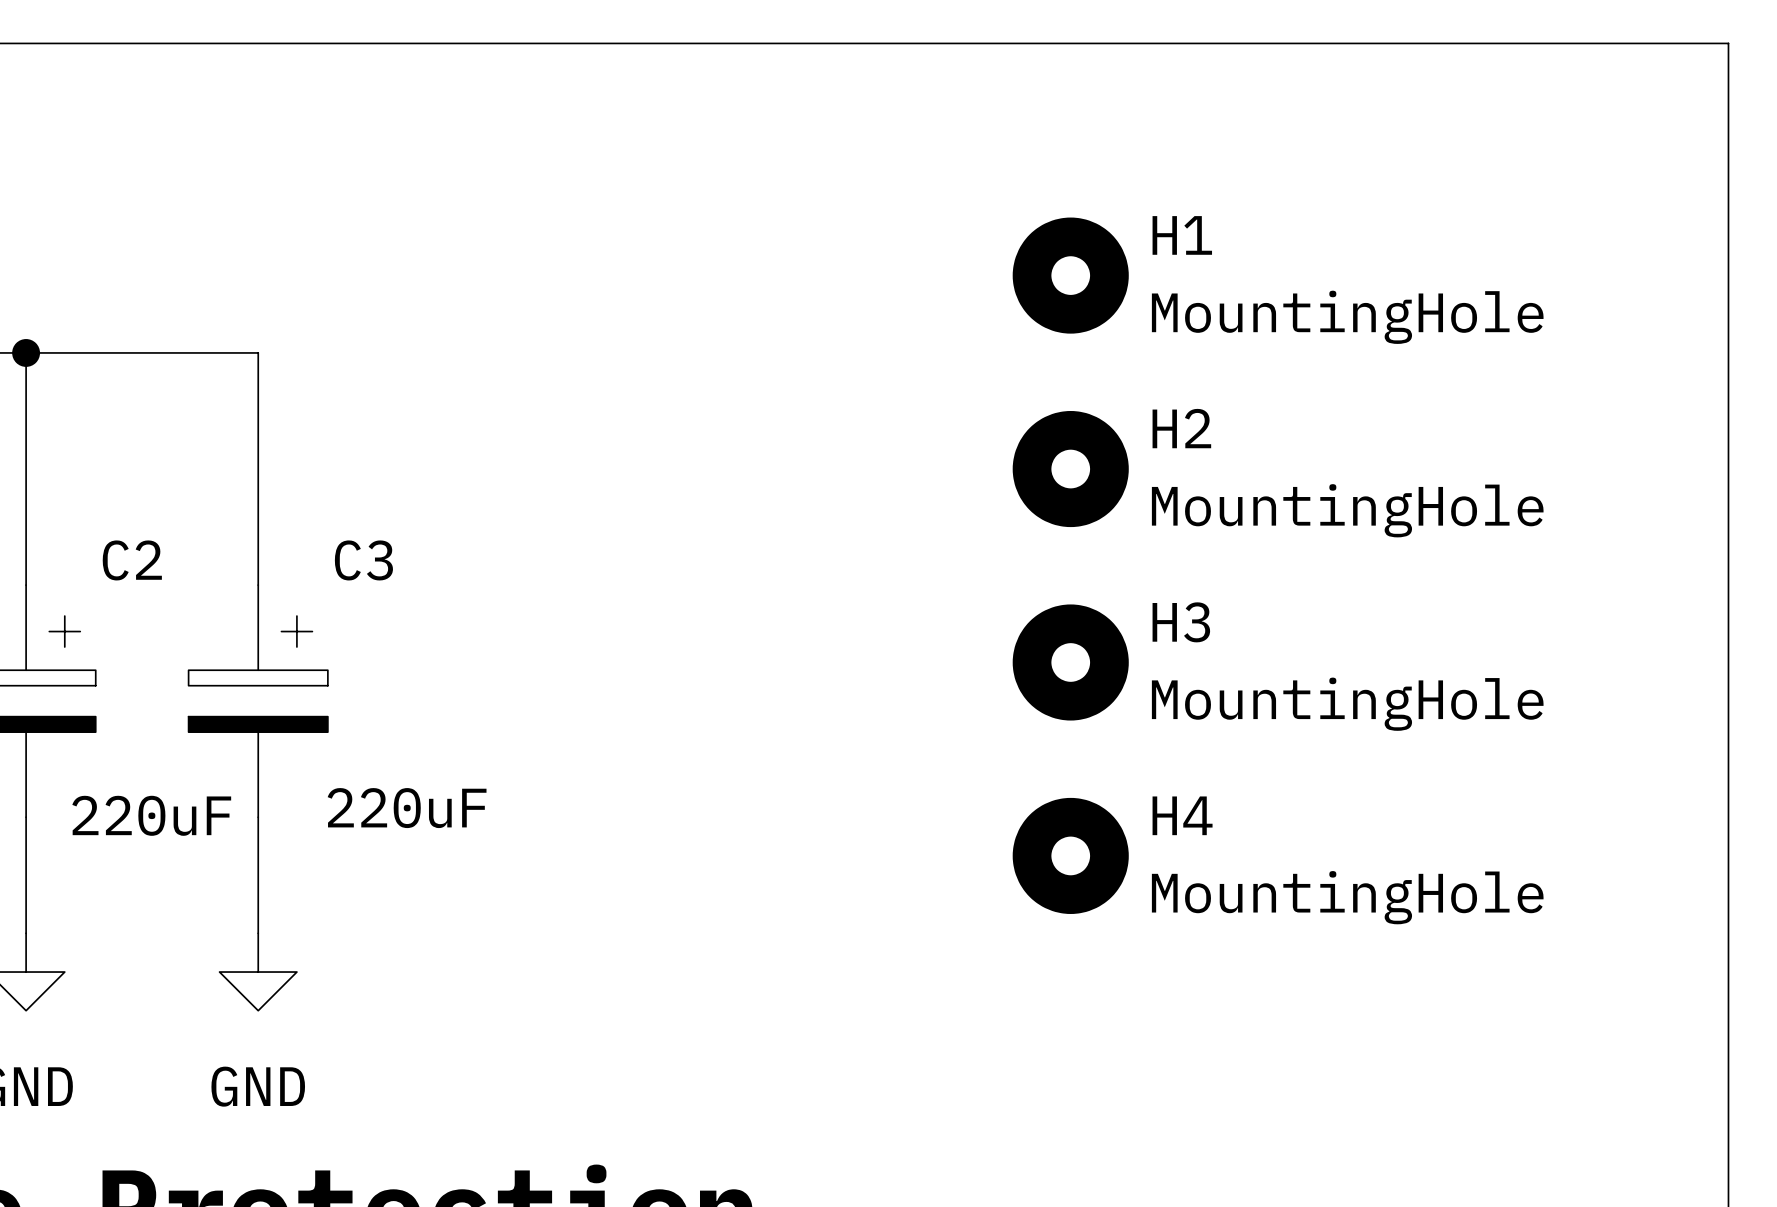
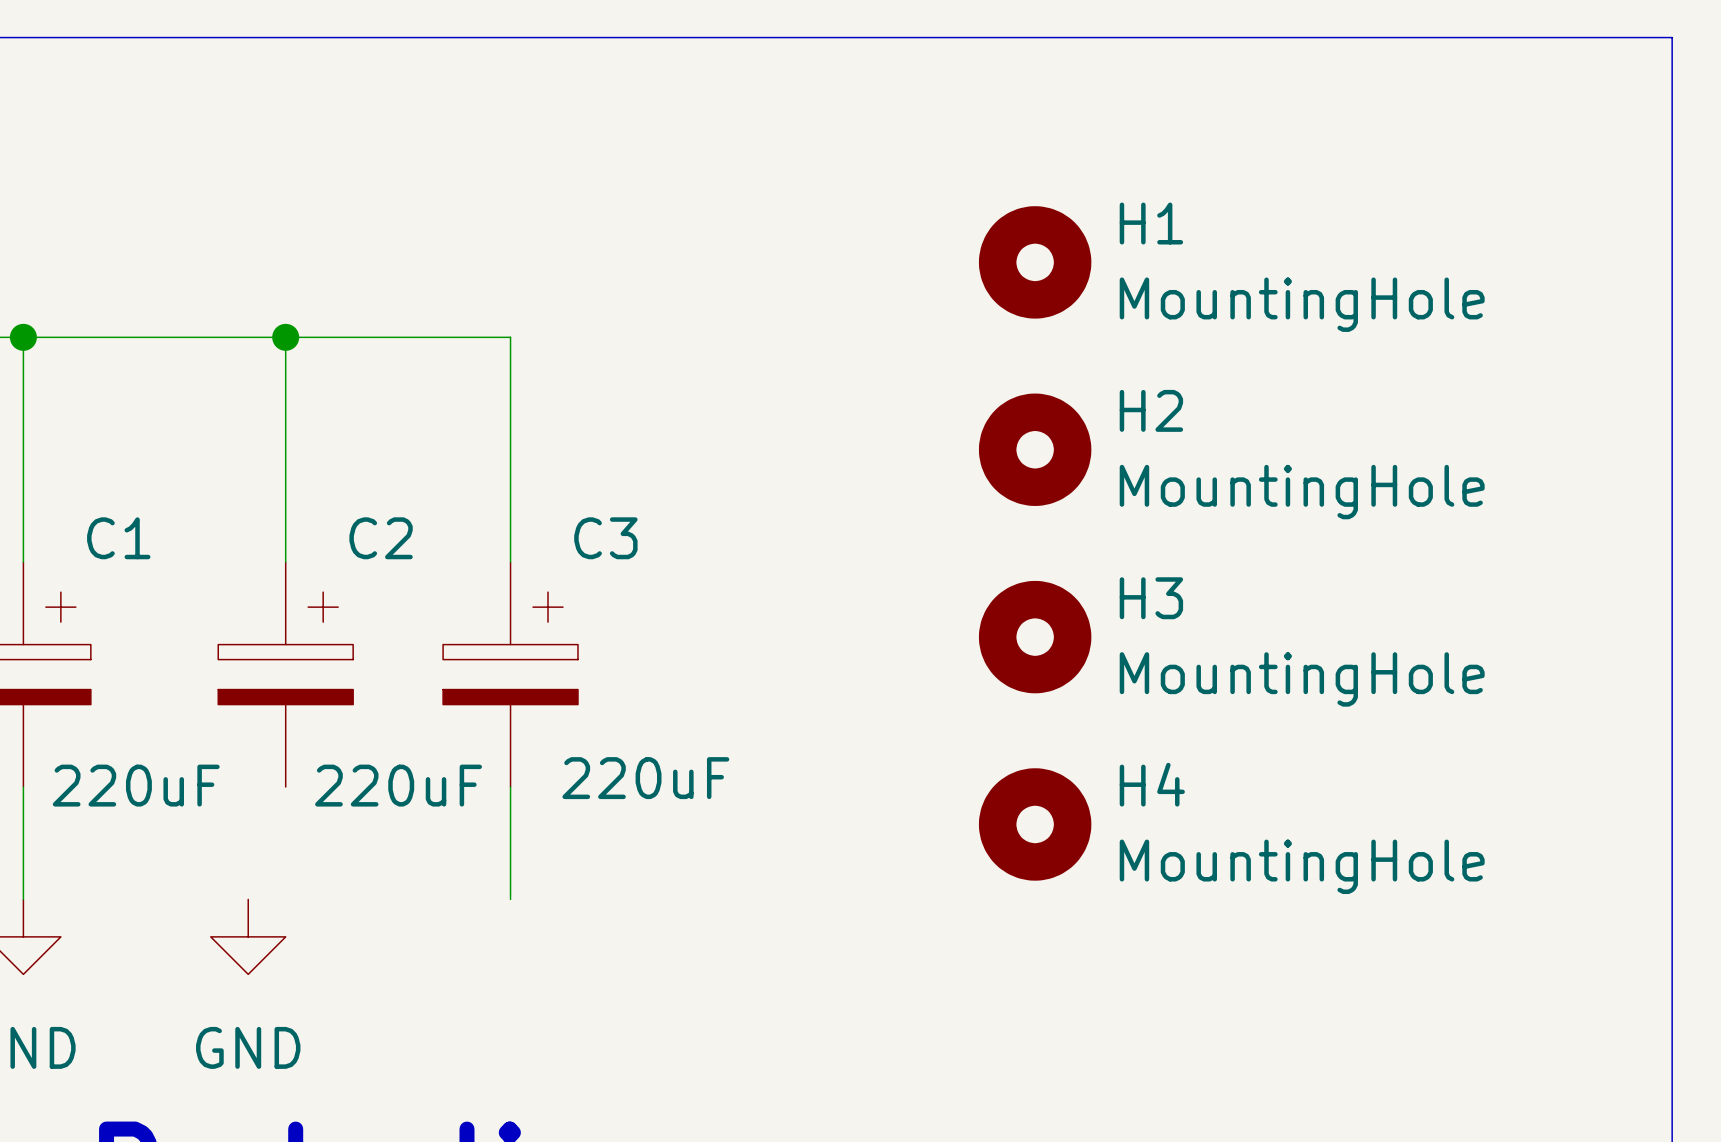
wire: (258, 352) (258, 585) -> (248, 337) (510, 337) (510, 562)
wire: none -> (285, 337) (285, 562)
junction: none -> (285, 337)
C2 name: C2 (132, 560) -> C1 (118, 538)
C3 position: (258, 701) -> (510, 674)
C2: none -> 220uF (285, 674)
wire: (258, 817) (258, 933) -> (510, 787) (510, 899)

